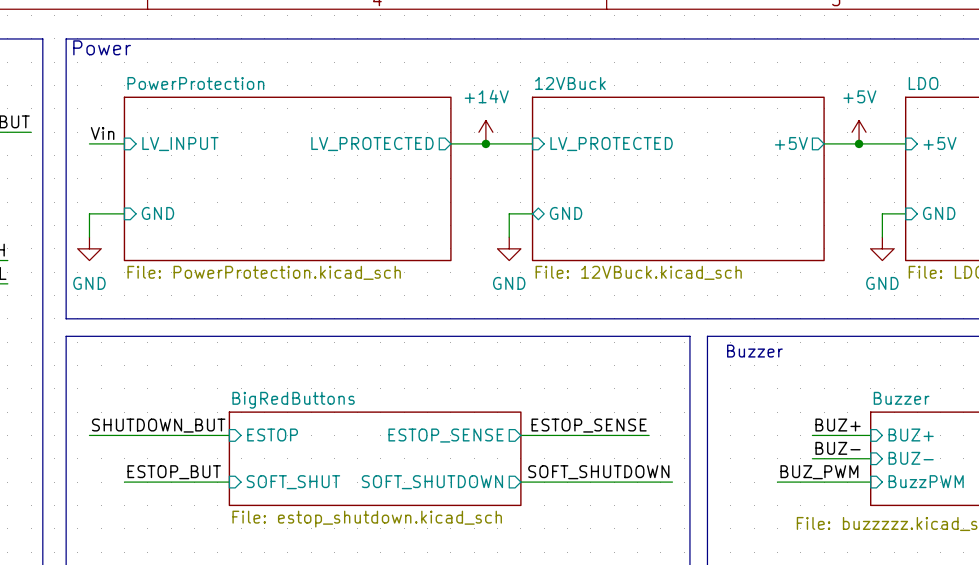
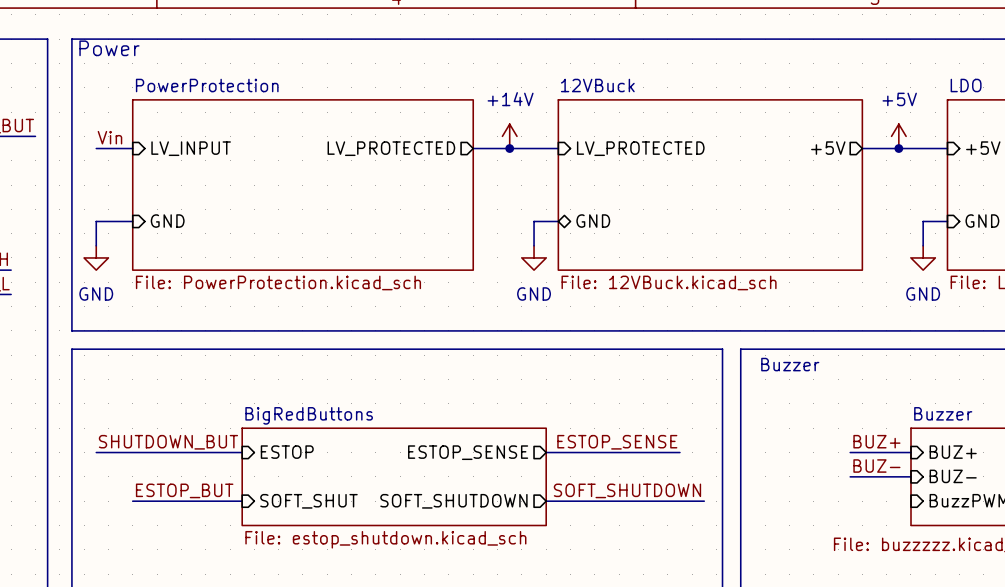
label: BUZ_PWM (819, 472) -> none
wire: (777, 482) (870, 482) -> none

